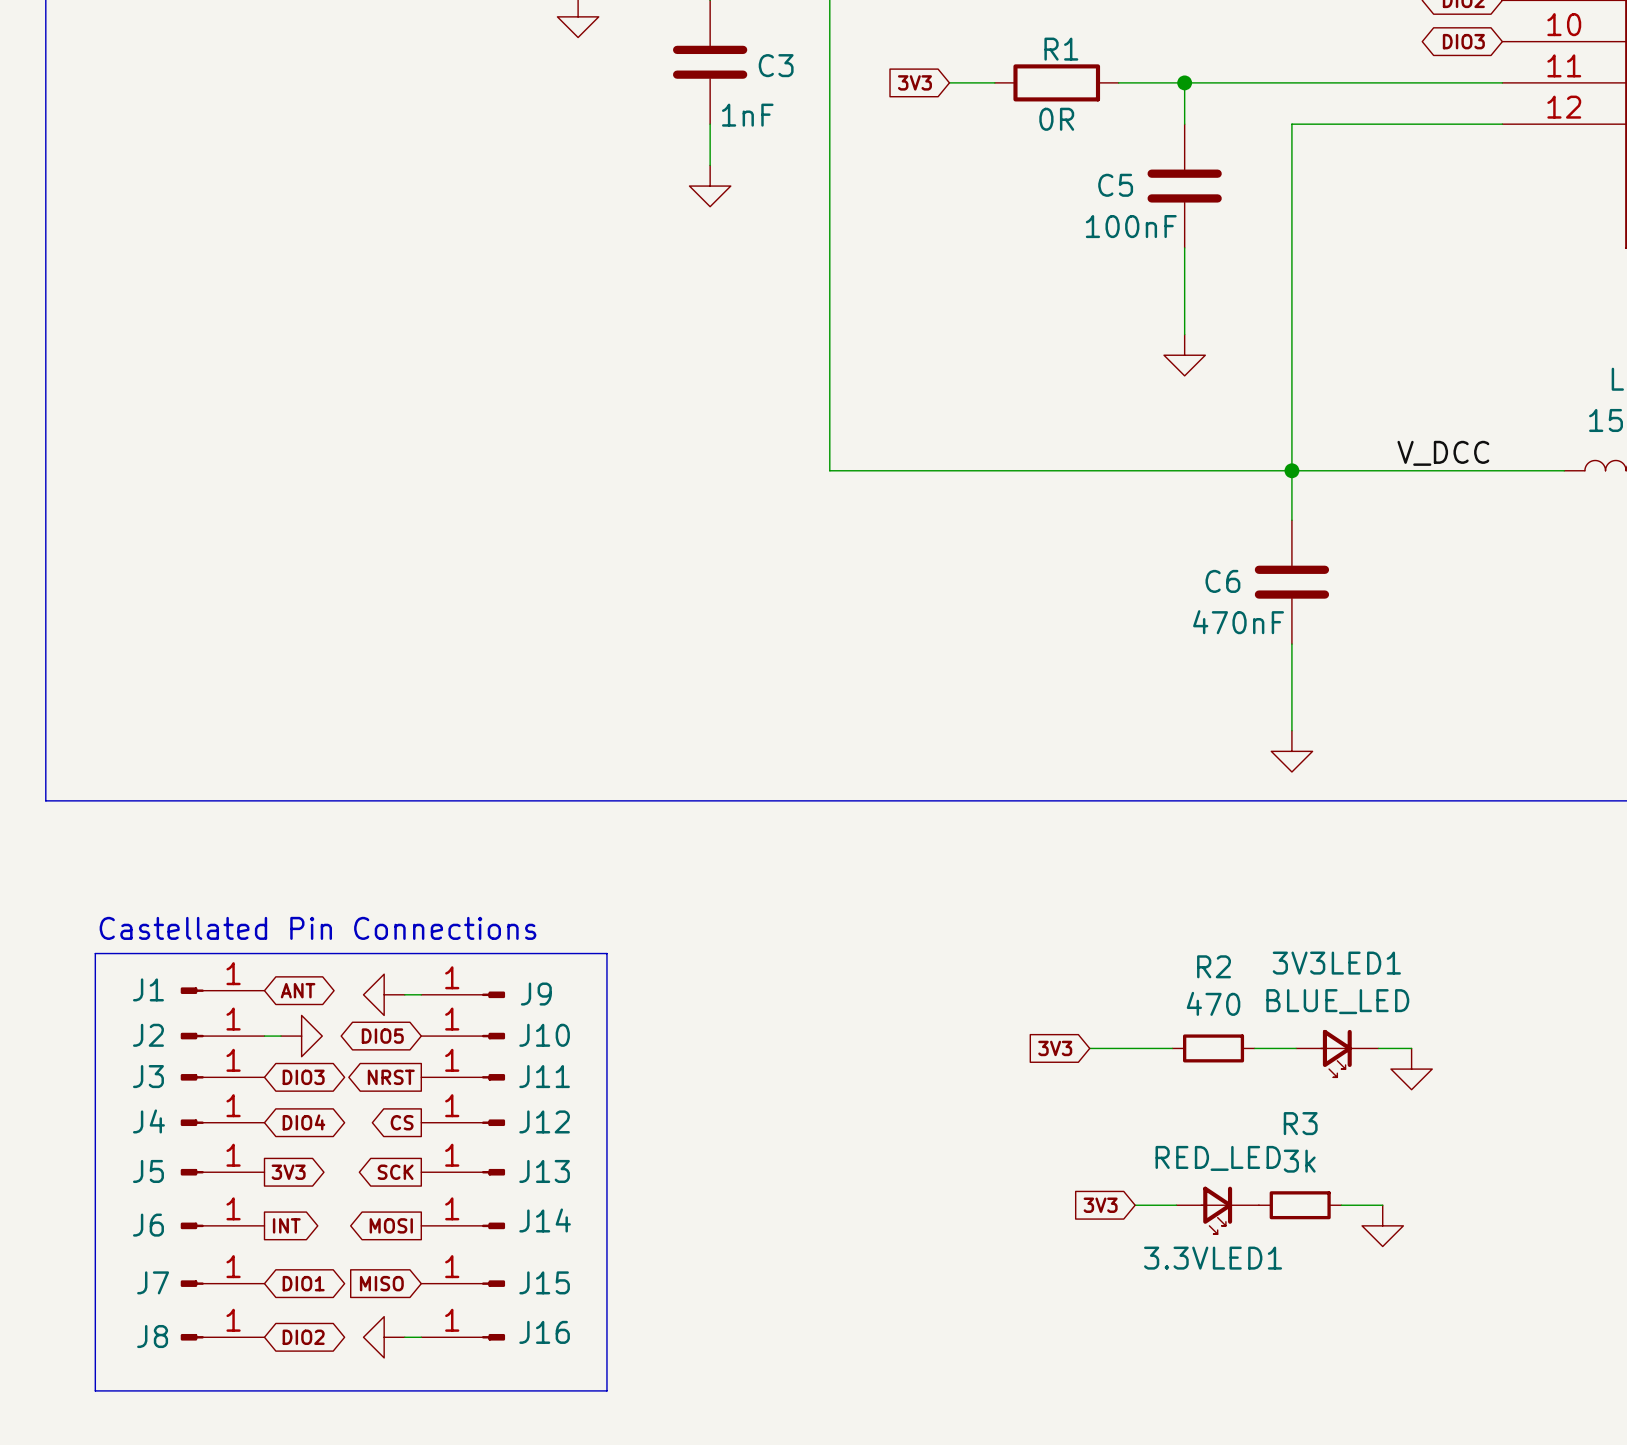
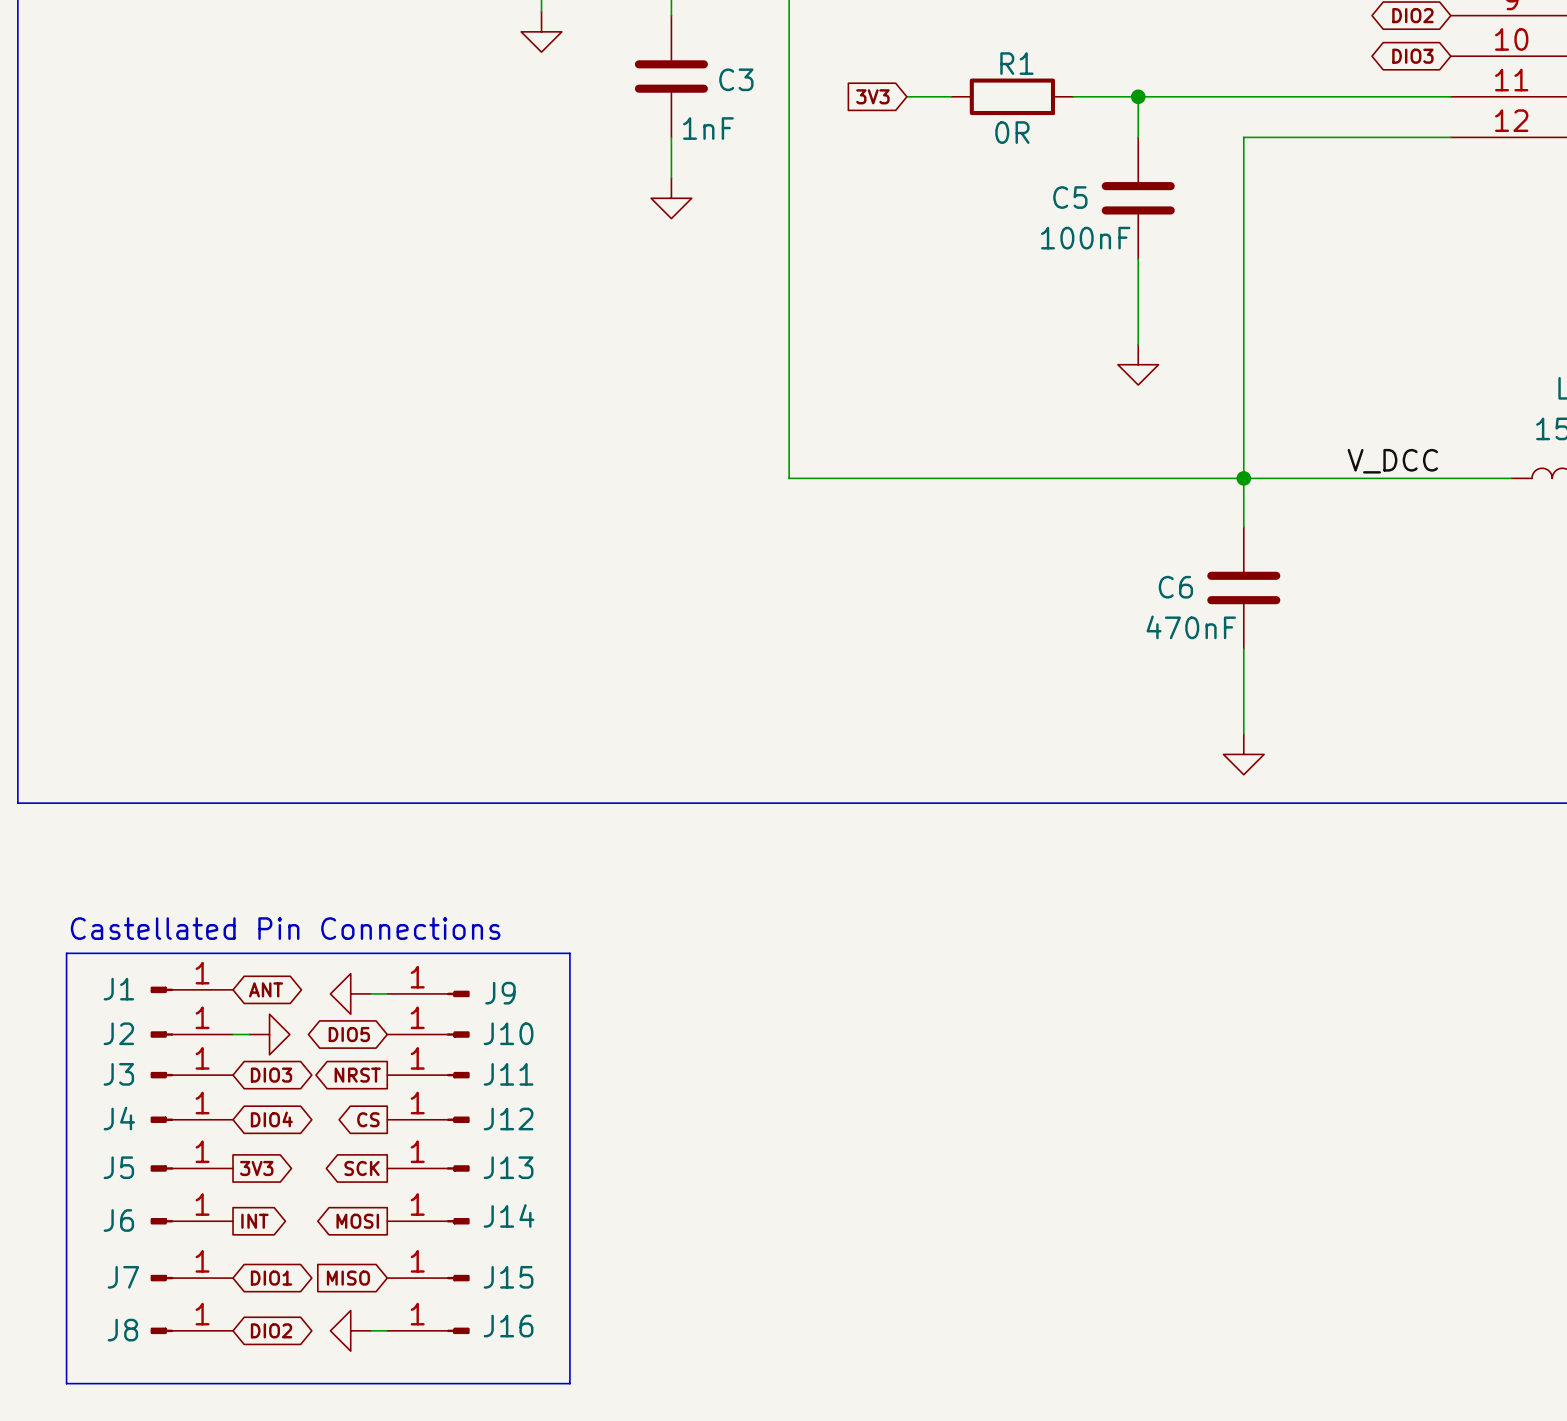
global label: 3V3 (1055, 1048) -> none
wire: (1089, 1048) (1172, 1048) -> none
R2: 470 (1213, 1048) -> none
wire: (1254, 1048) (1296, 1048) -> none
wire: (1378, 1048) (1411, 1048) -> none
3V3LED1: BLUE_LED (1337, 1053) -> none
power symbol: (1411, 1069) -> none
global label: 3V3 (1100, 1205) -> none
wire: (1135, 1205) (1176, 1205) -> none
R3: 3k (1300, 1205) -> none
wire: (1341, 1205) (1382, 1205) -> none
3.3VLED1: RED_LED (1217, 1210) -> none
power symbol: (1382, 1225) -> none

